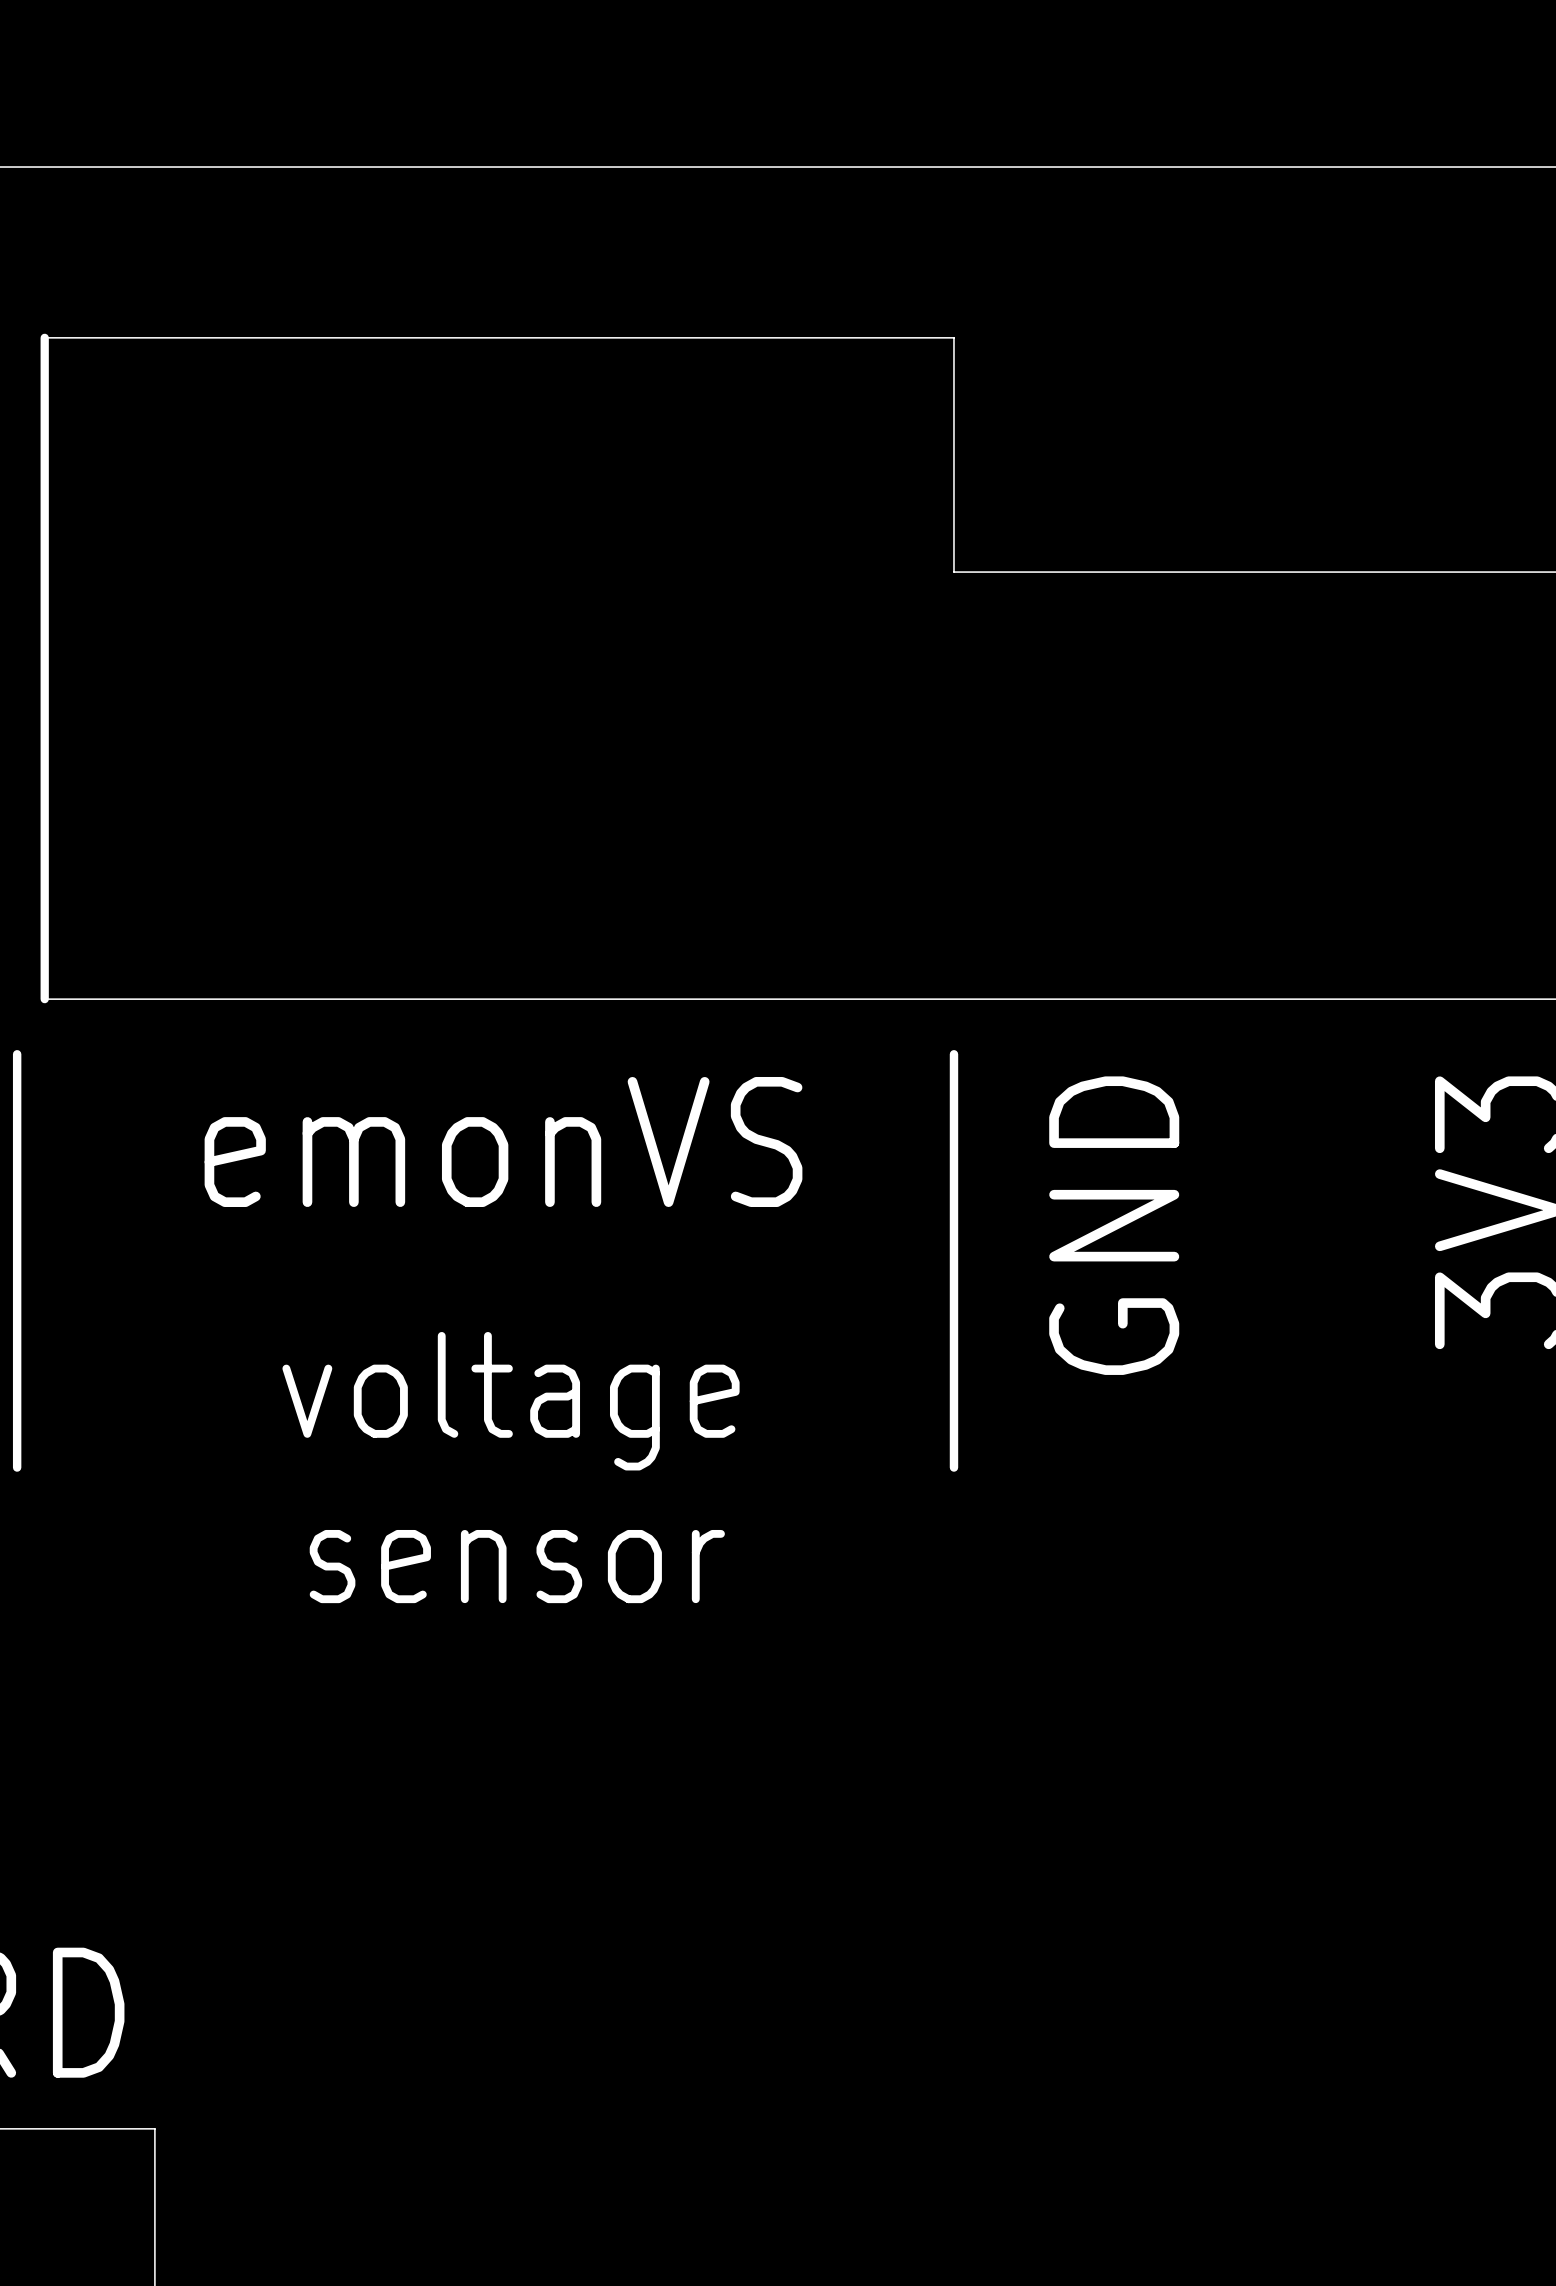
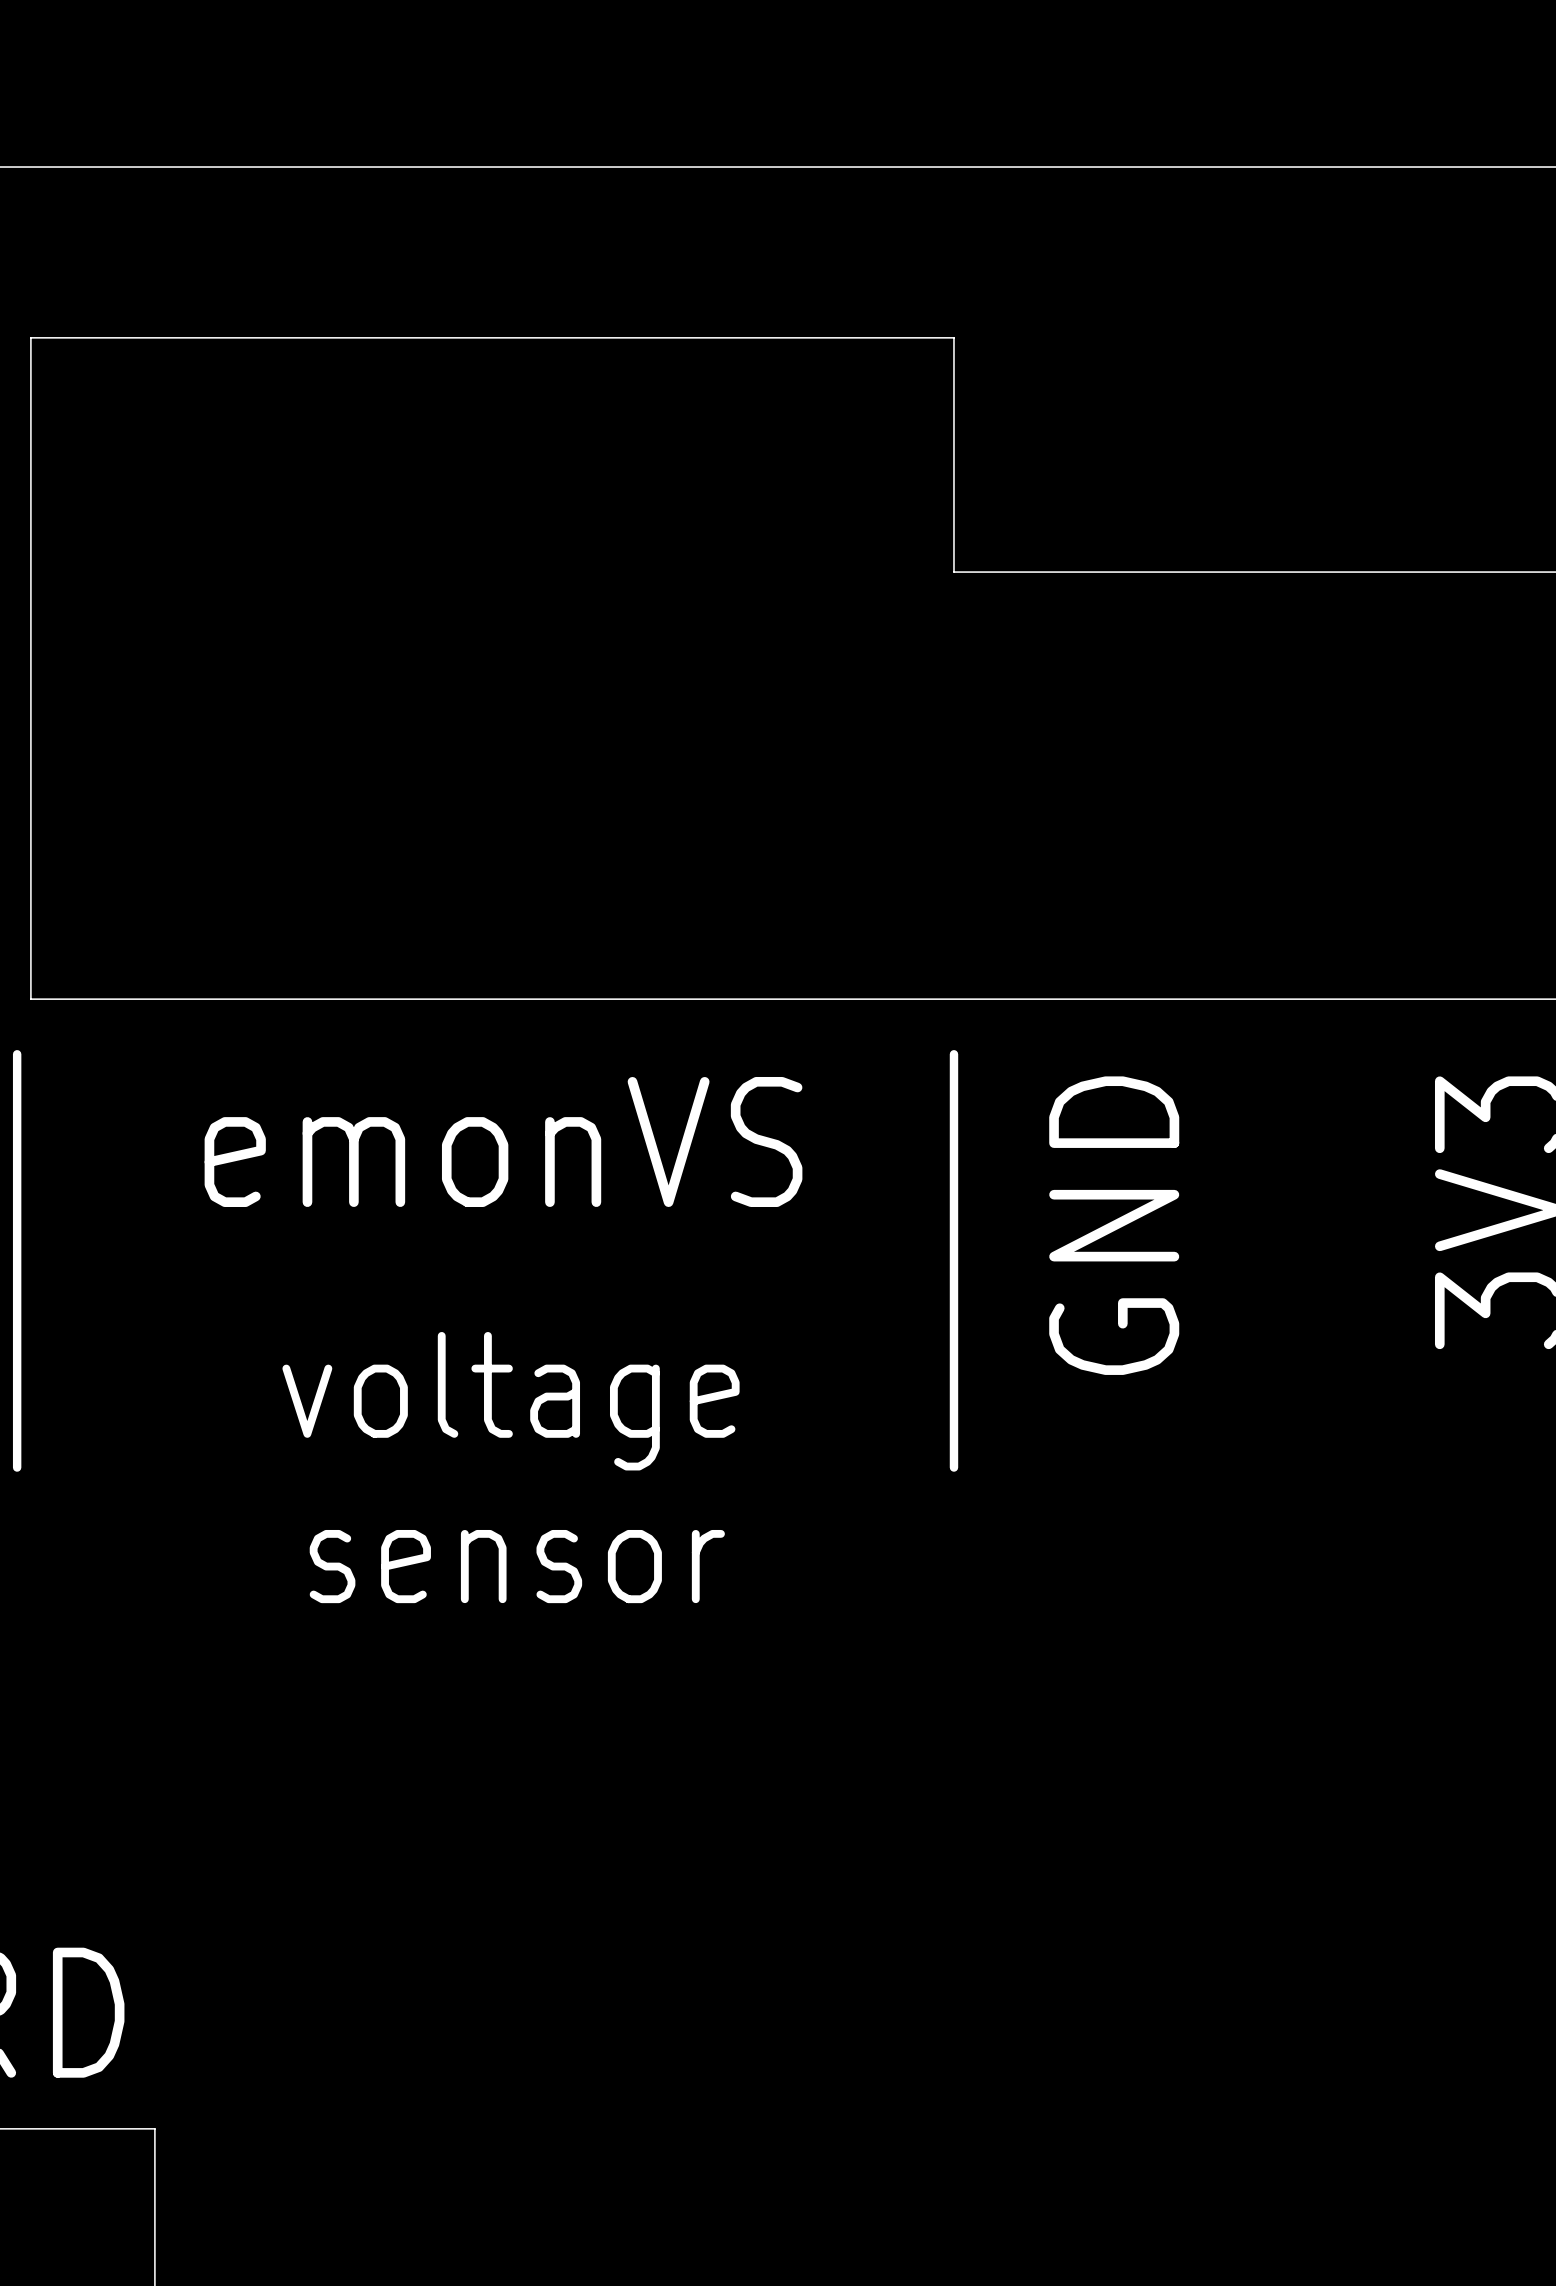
board edge: (44, 337) (44, 999) -> (44, 337) (30, 337) (30, 999) (44, 999)

